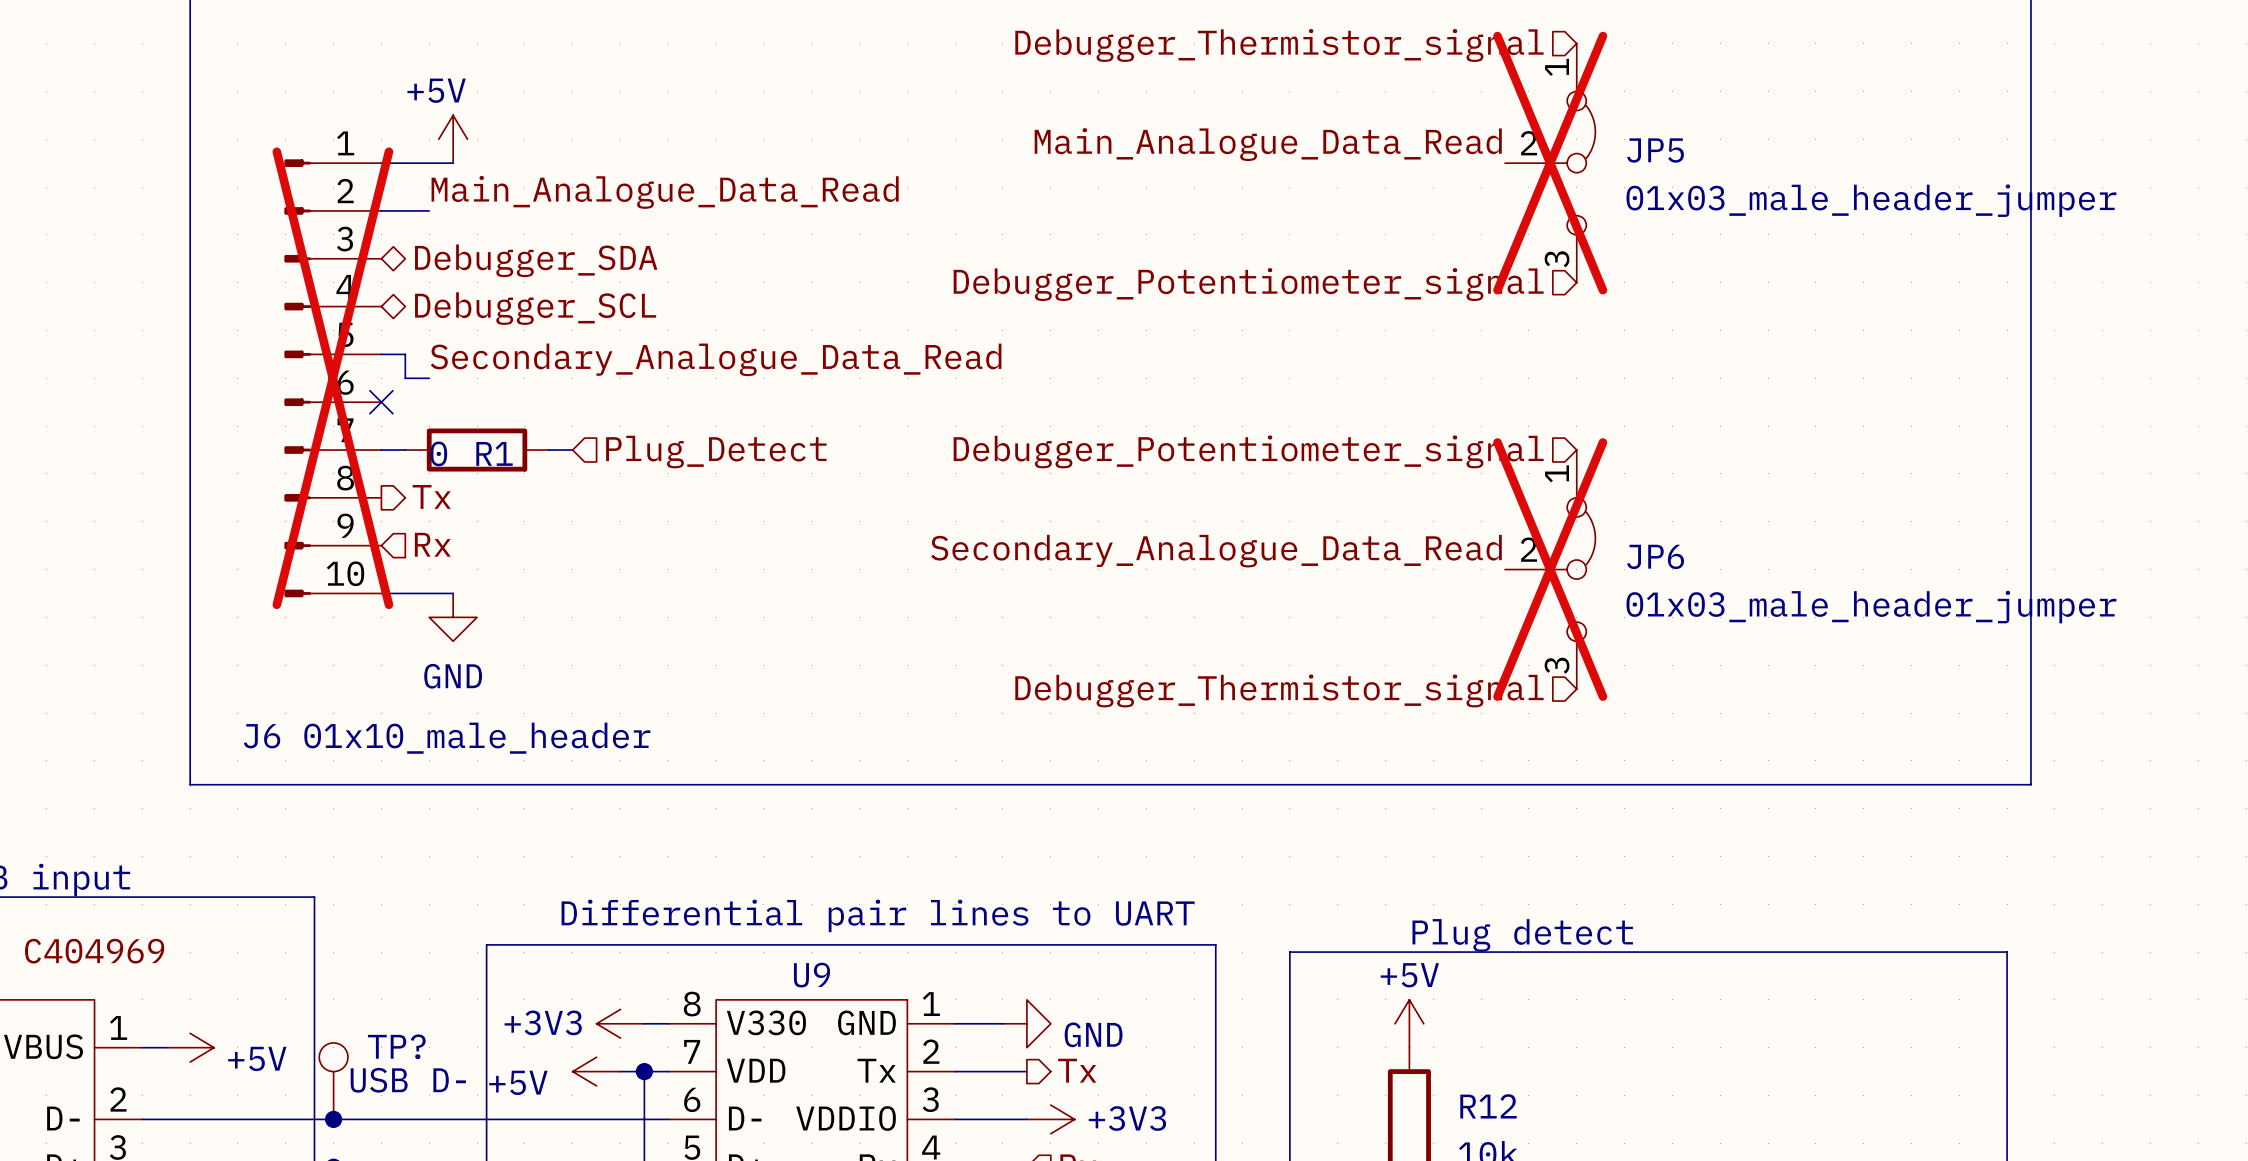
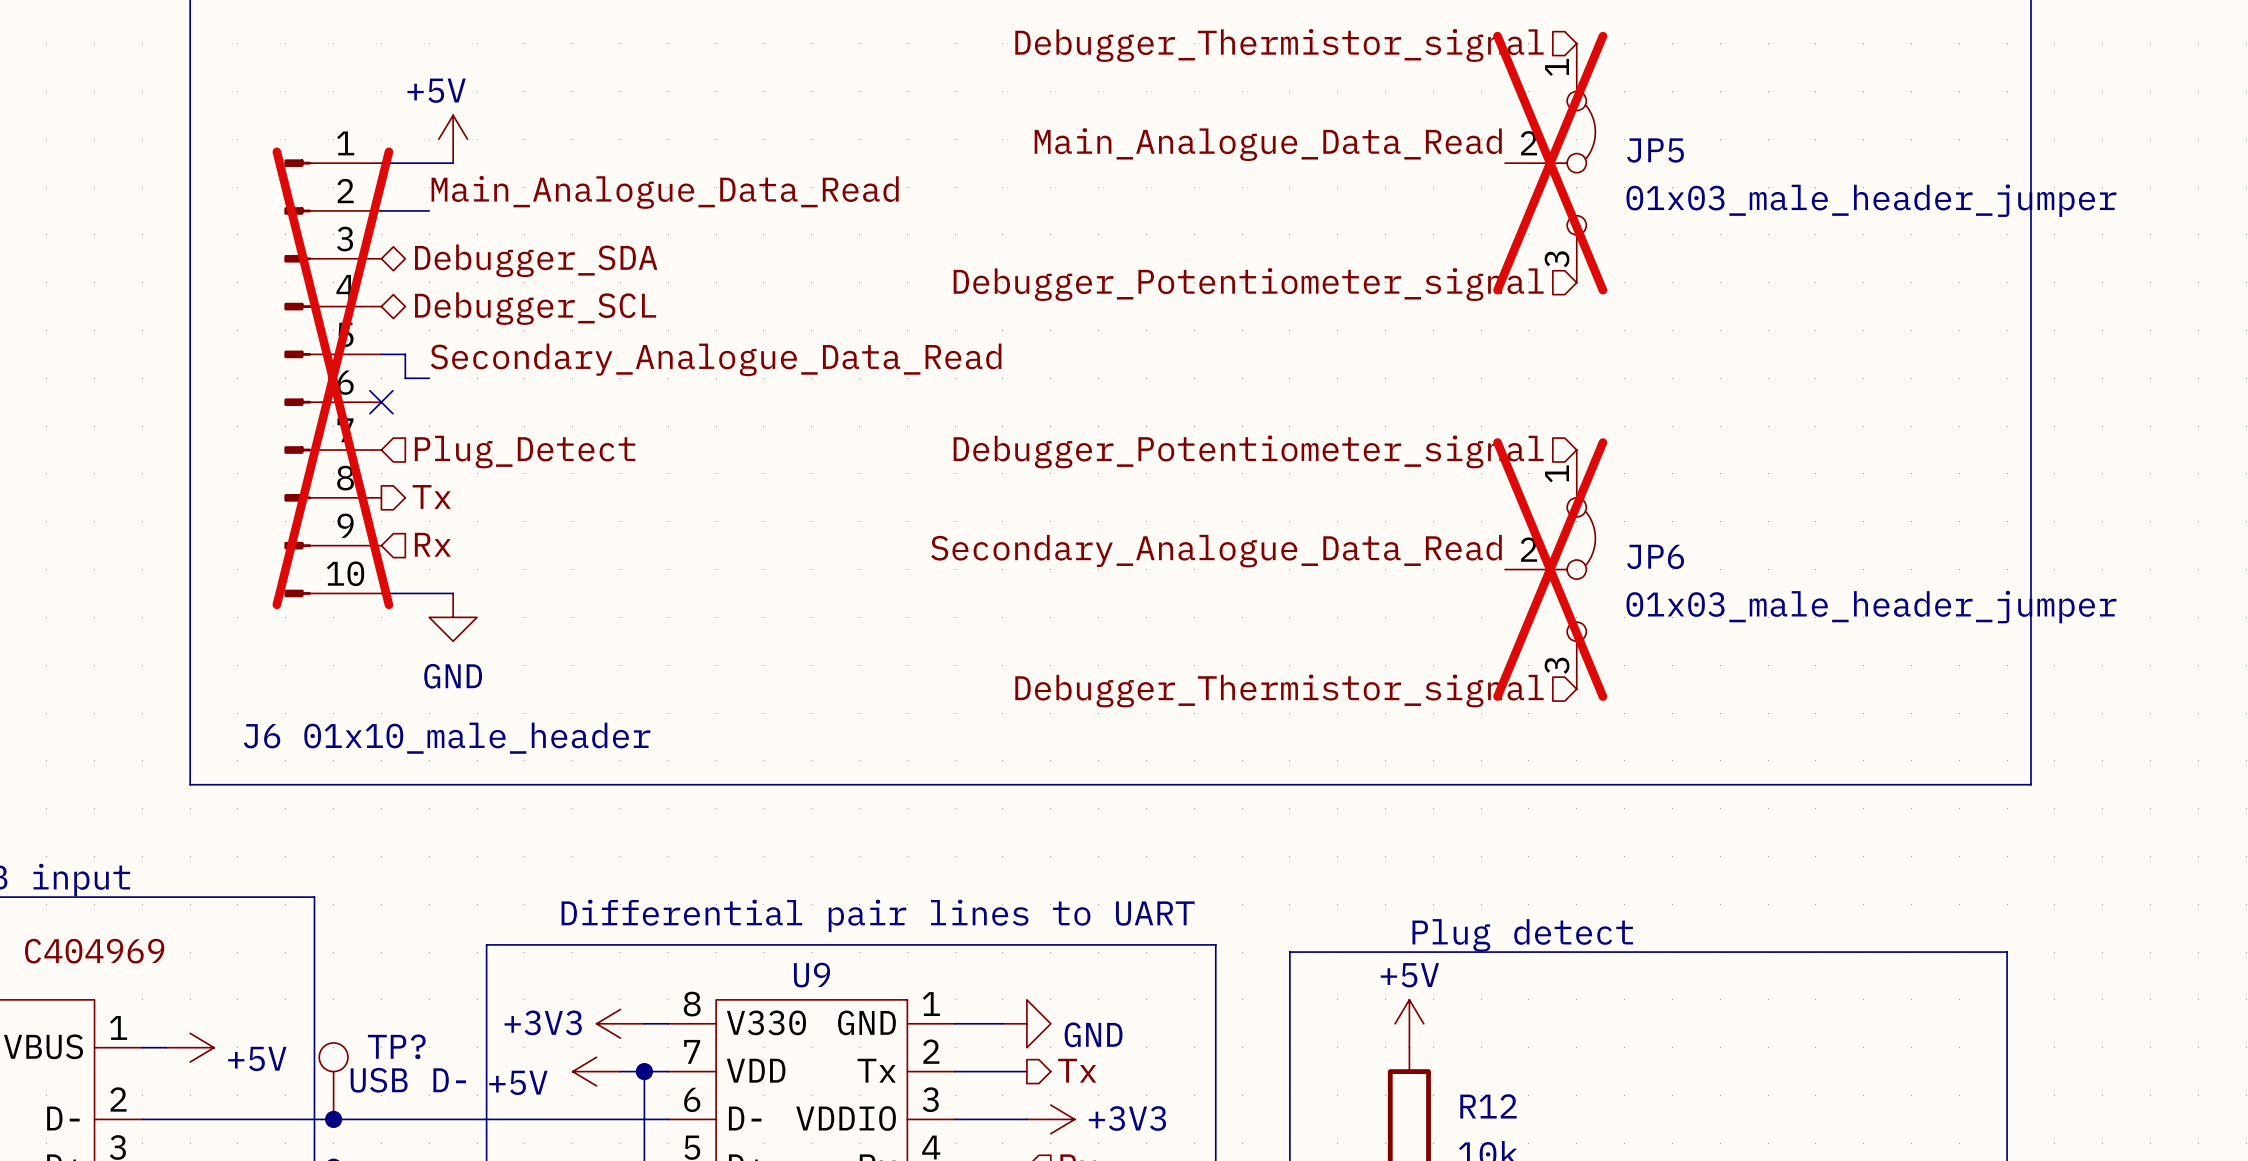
wire: (381, 450) (405, 450) -> none
R1: 0 (477, 450) -> none
wire: (548, 450) (572, 450) -> none
hierarchical label position: Plug_Detect (716, 452) -> Plug_Detect (525, 452)

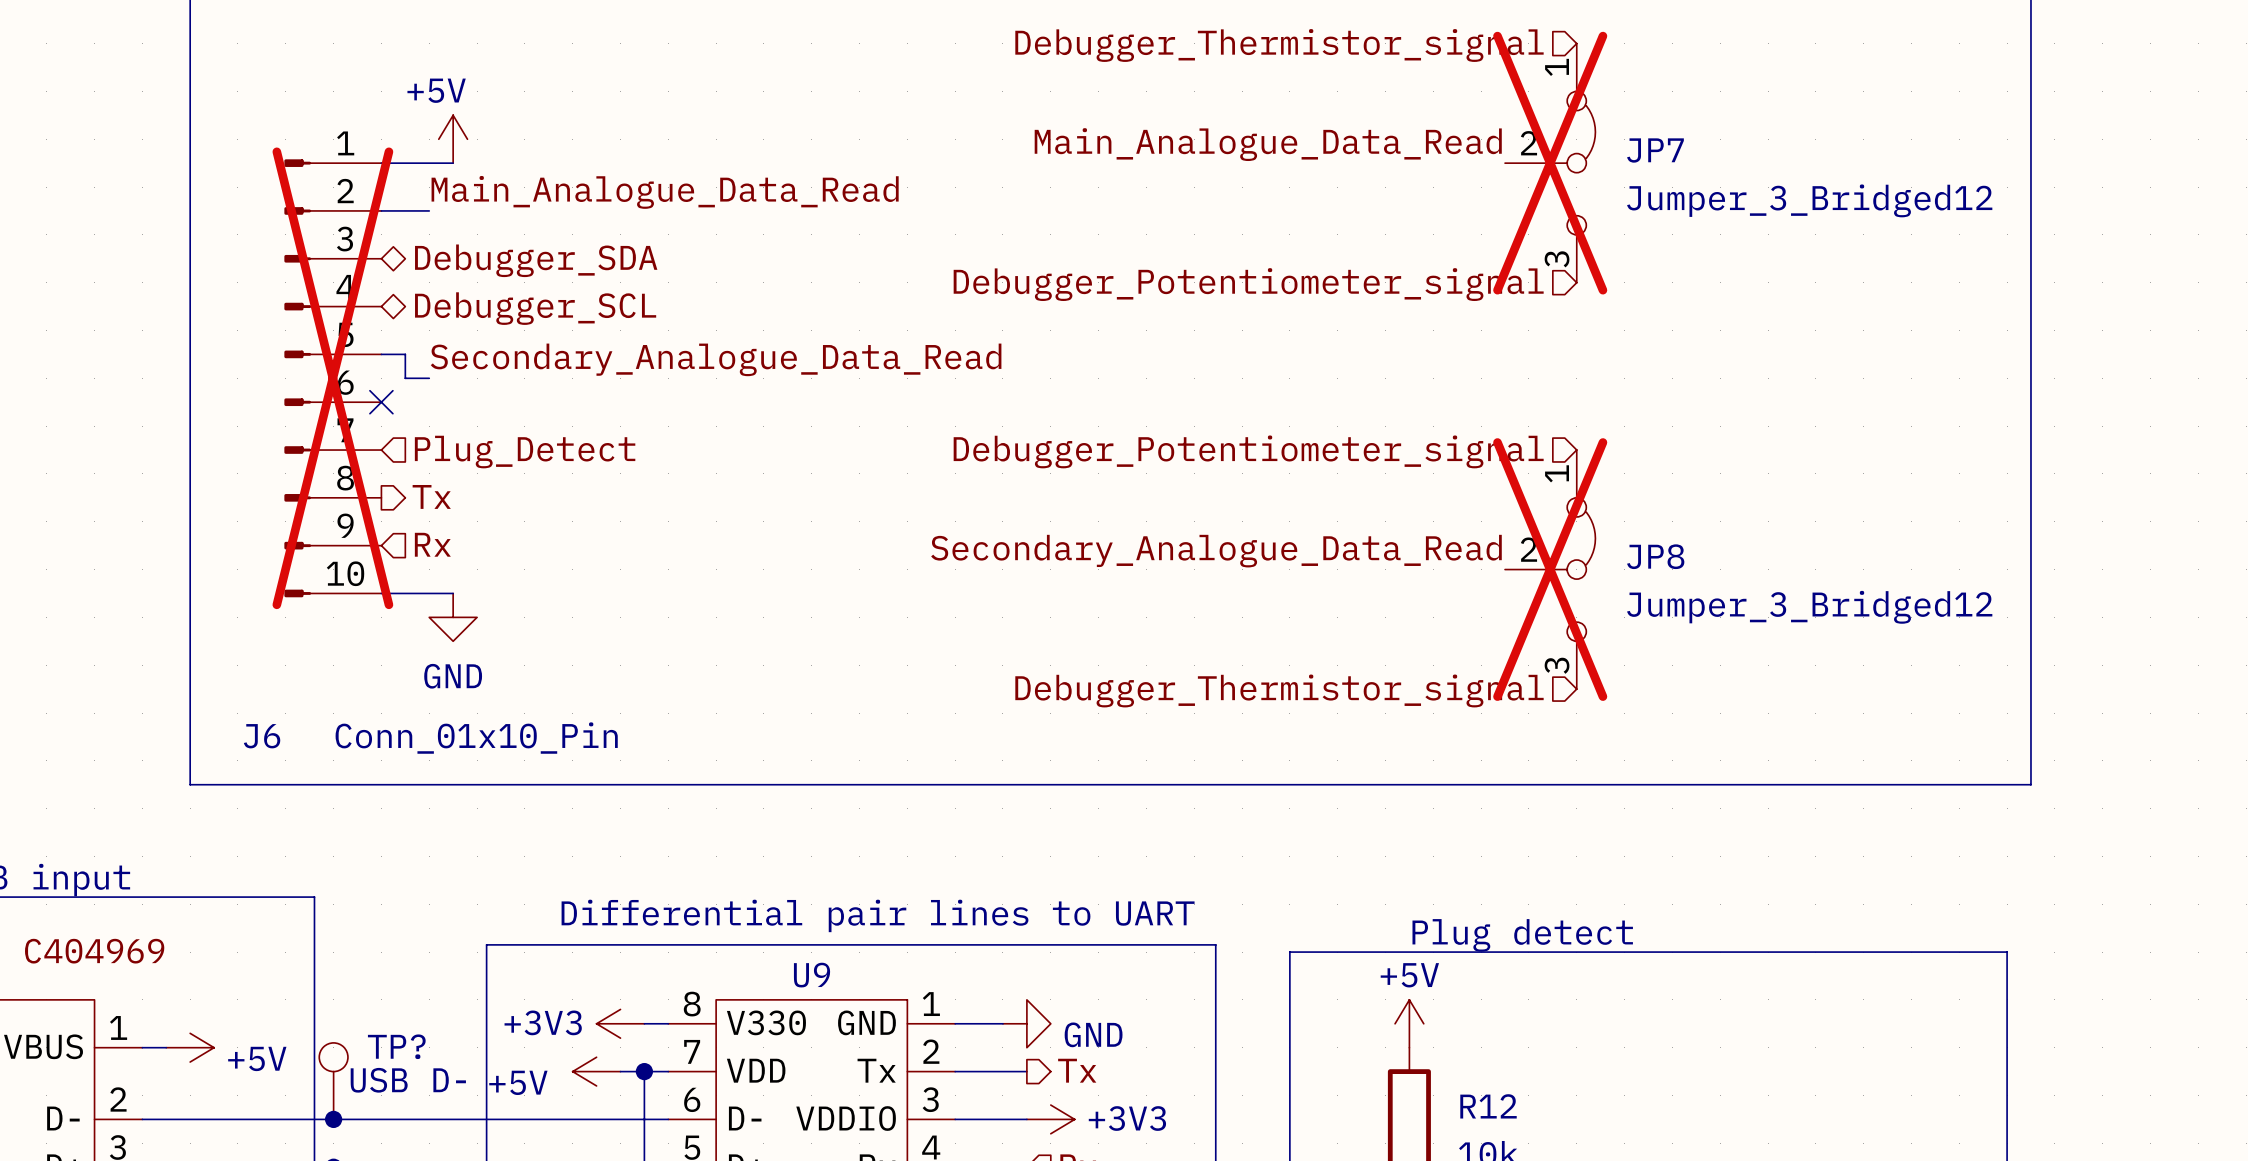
JP5 name: JP5 (1655, 150) -> JP7 (1655, 150)
JP5 value: 01x03_male_header_jumper (1871, 200) -> Jumper_3_Bridged12 (1809, 200)
JP6 name: JP6 (1655, 556) -> JP8 (1655, 556)
JP6 value: 01x03_male_header_jumper (1871, 607) -> Jumper_3_Bridged12 (1809, 607)
J6 value: 01x10_male_header (477, 738) -> Conn_01x10_Pin (476, 738)

